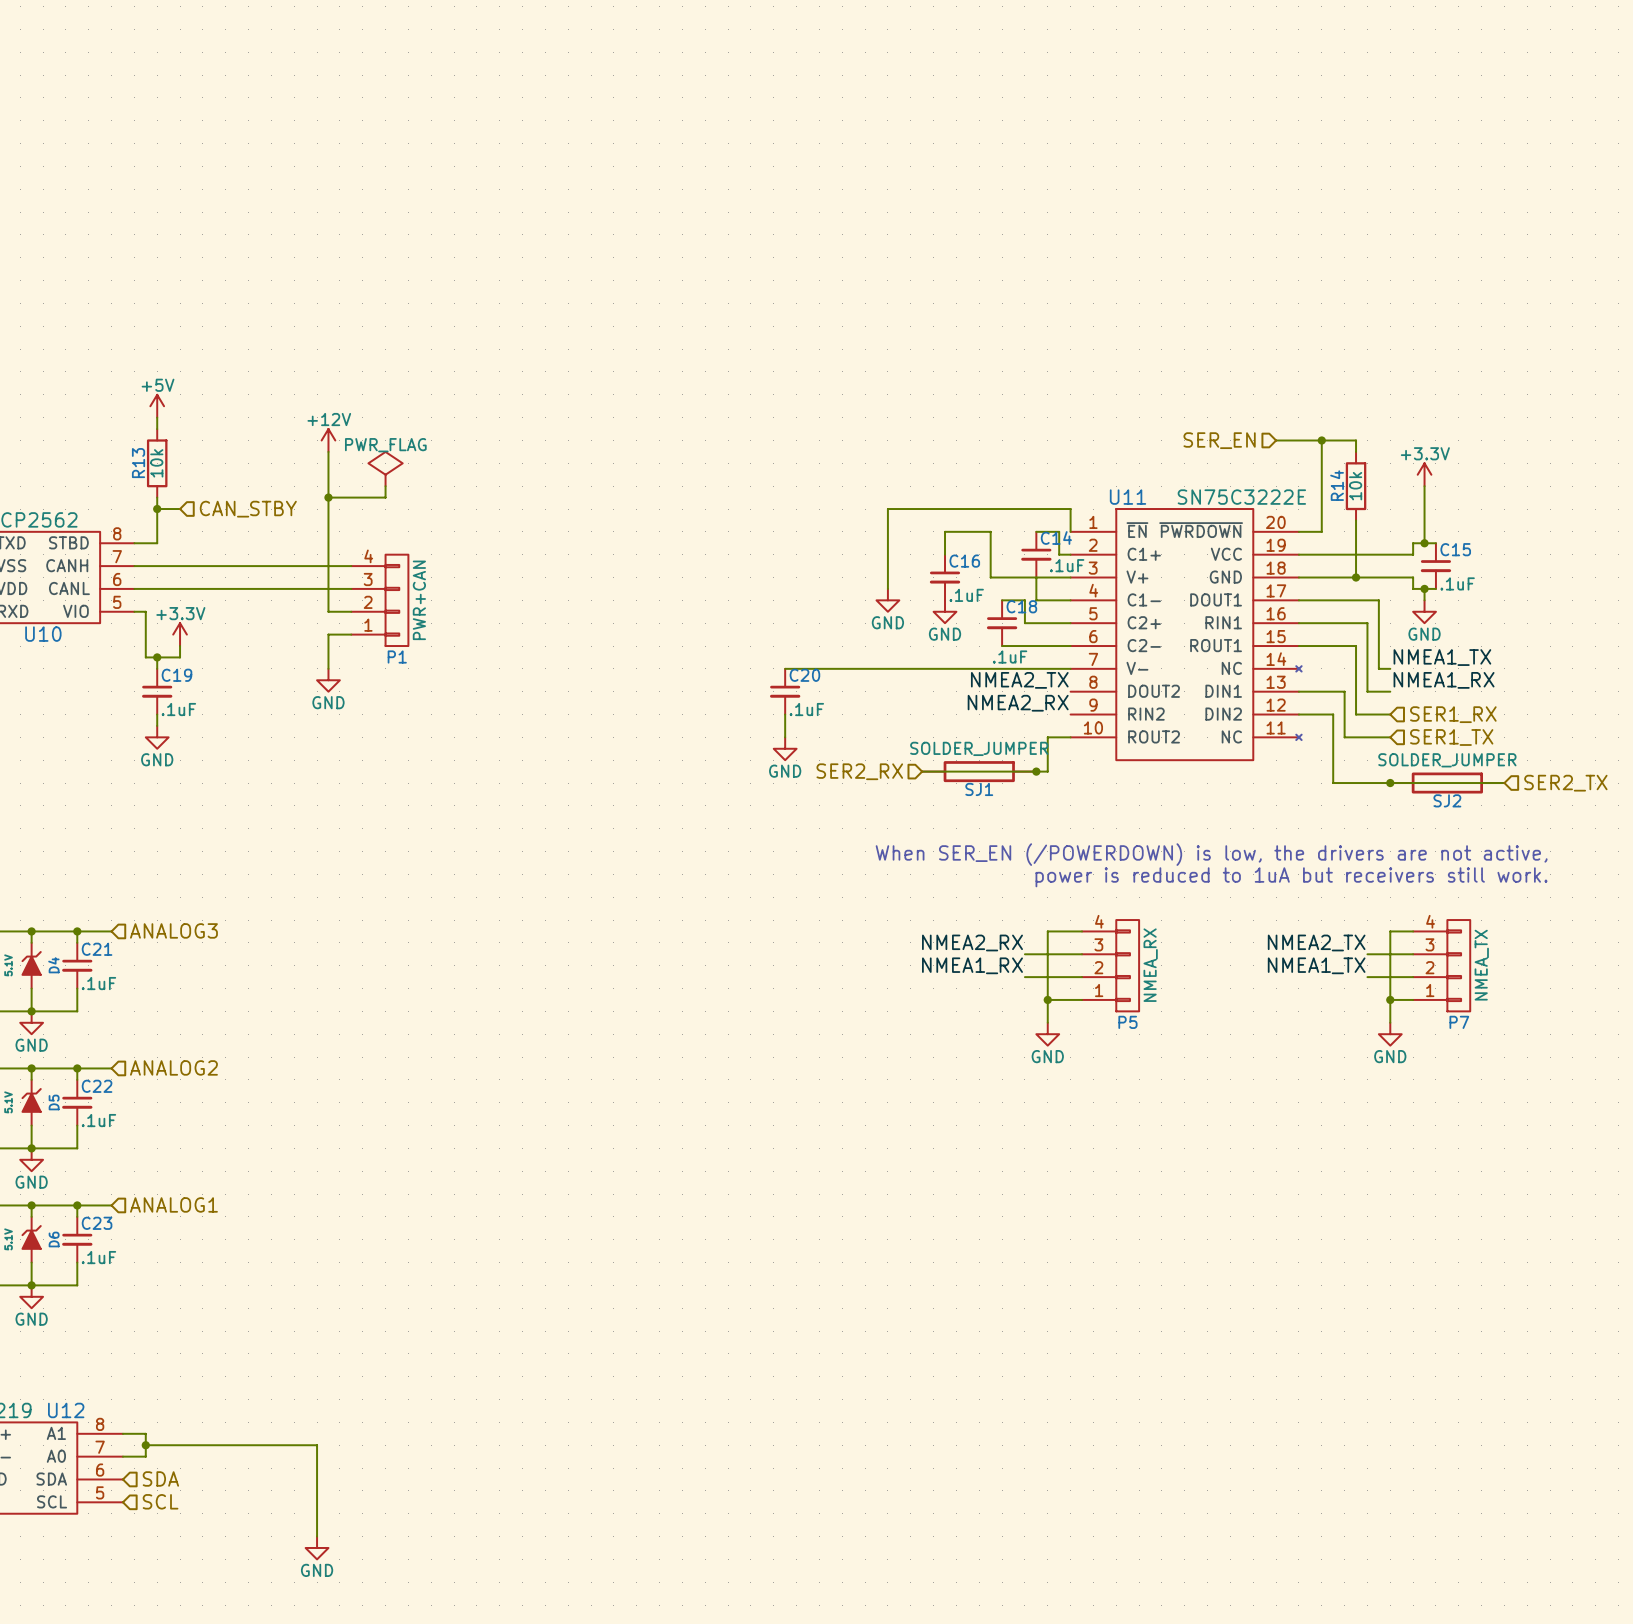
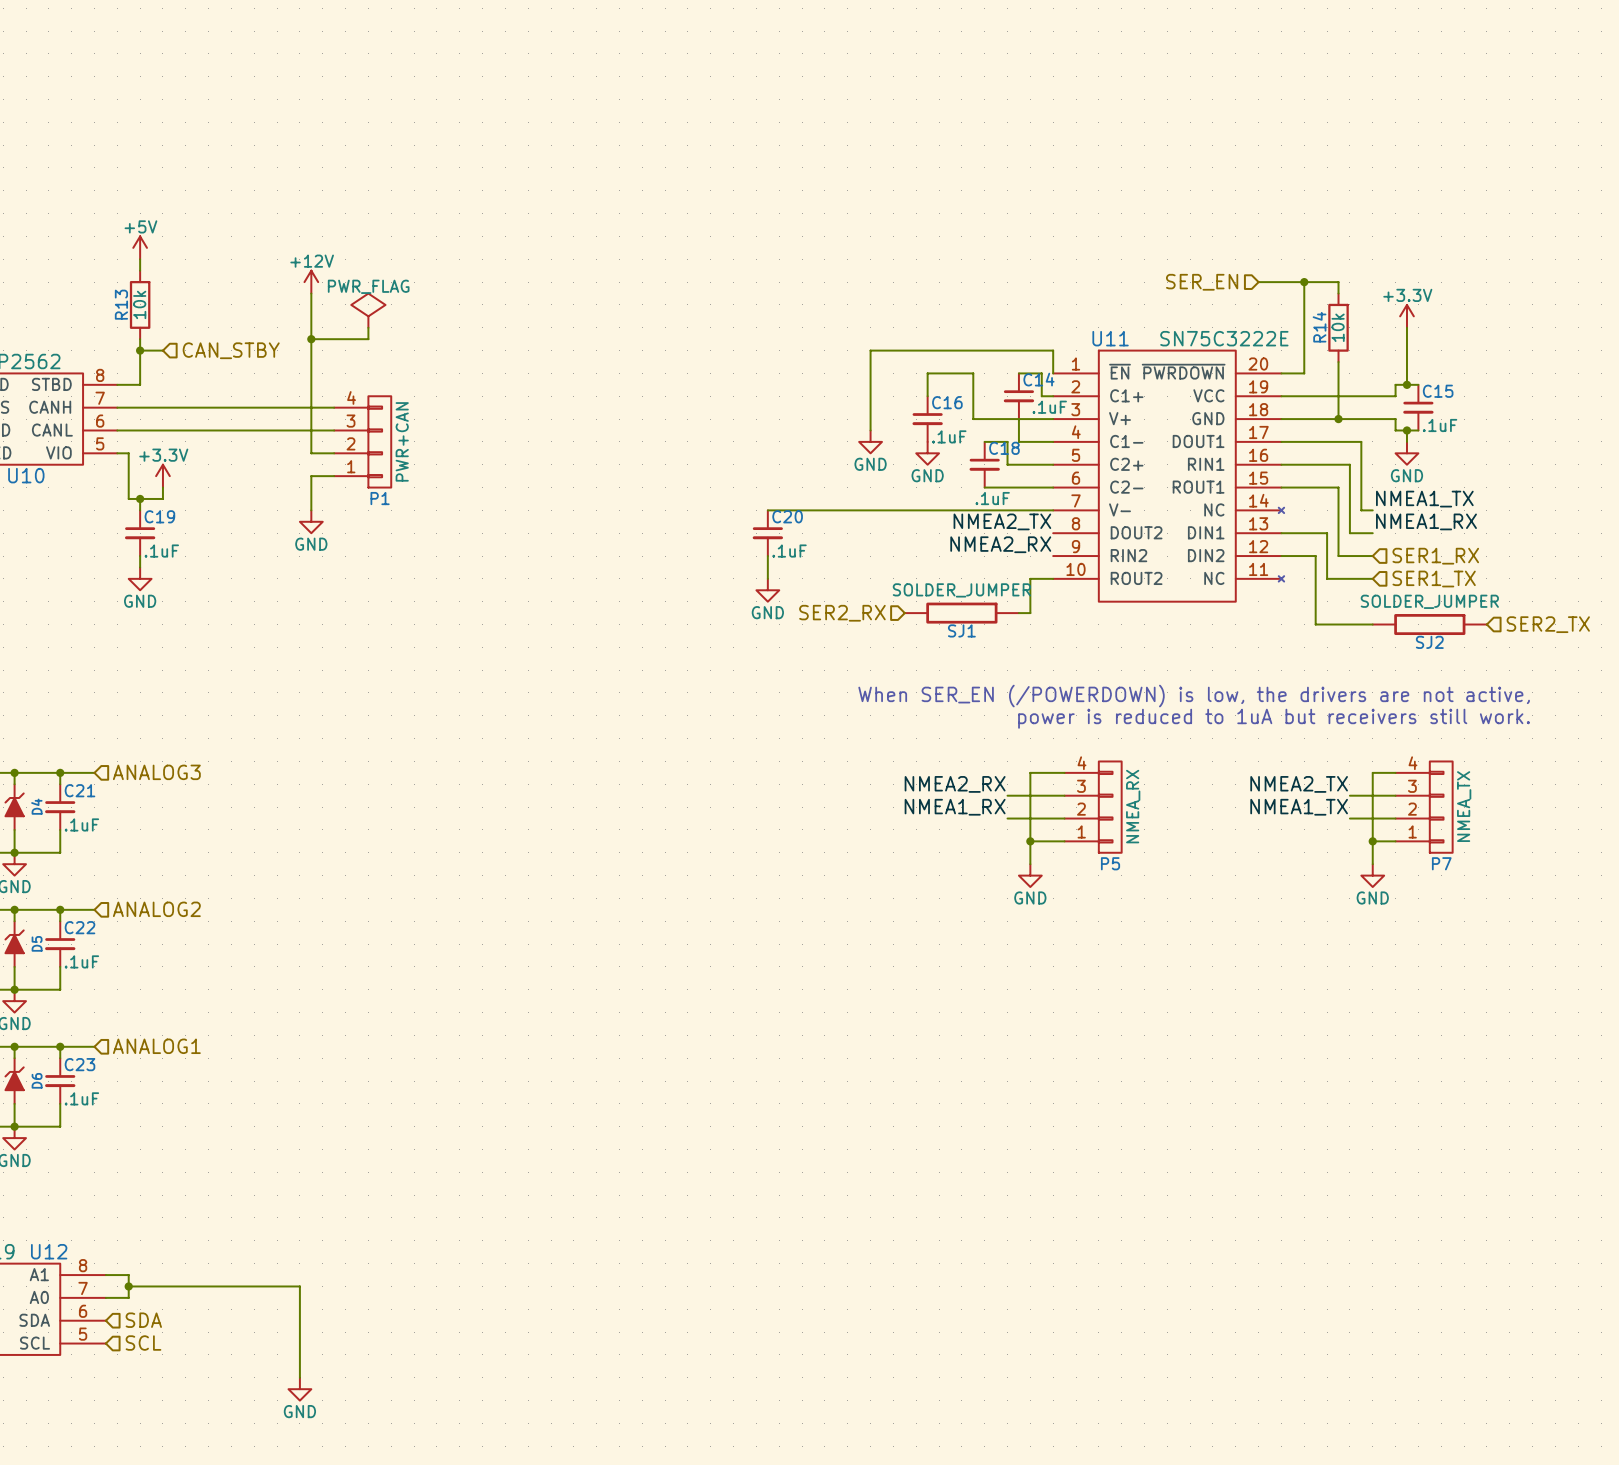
wire: (922, 771) (1036, 771) -> none
junction: (1036, 771) -> none
wire: (1390, 783) (1504, 783) -> none
junction: (1390, 783) -> none

